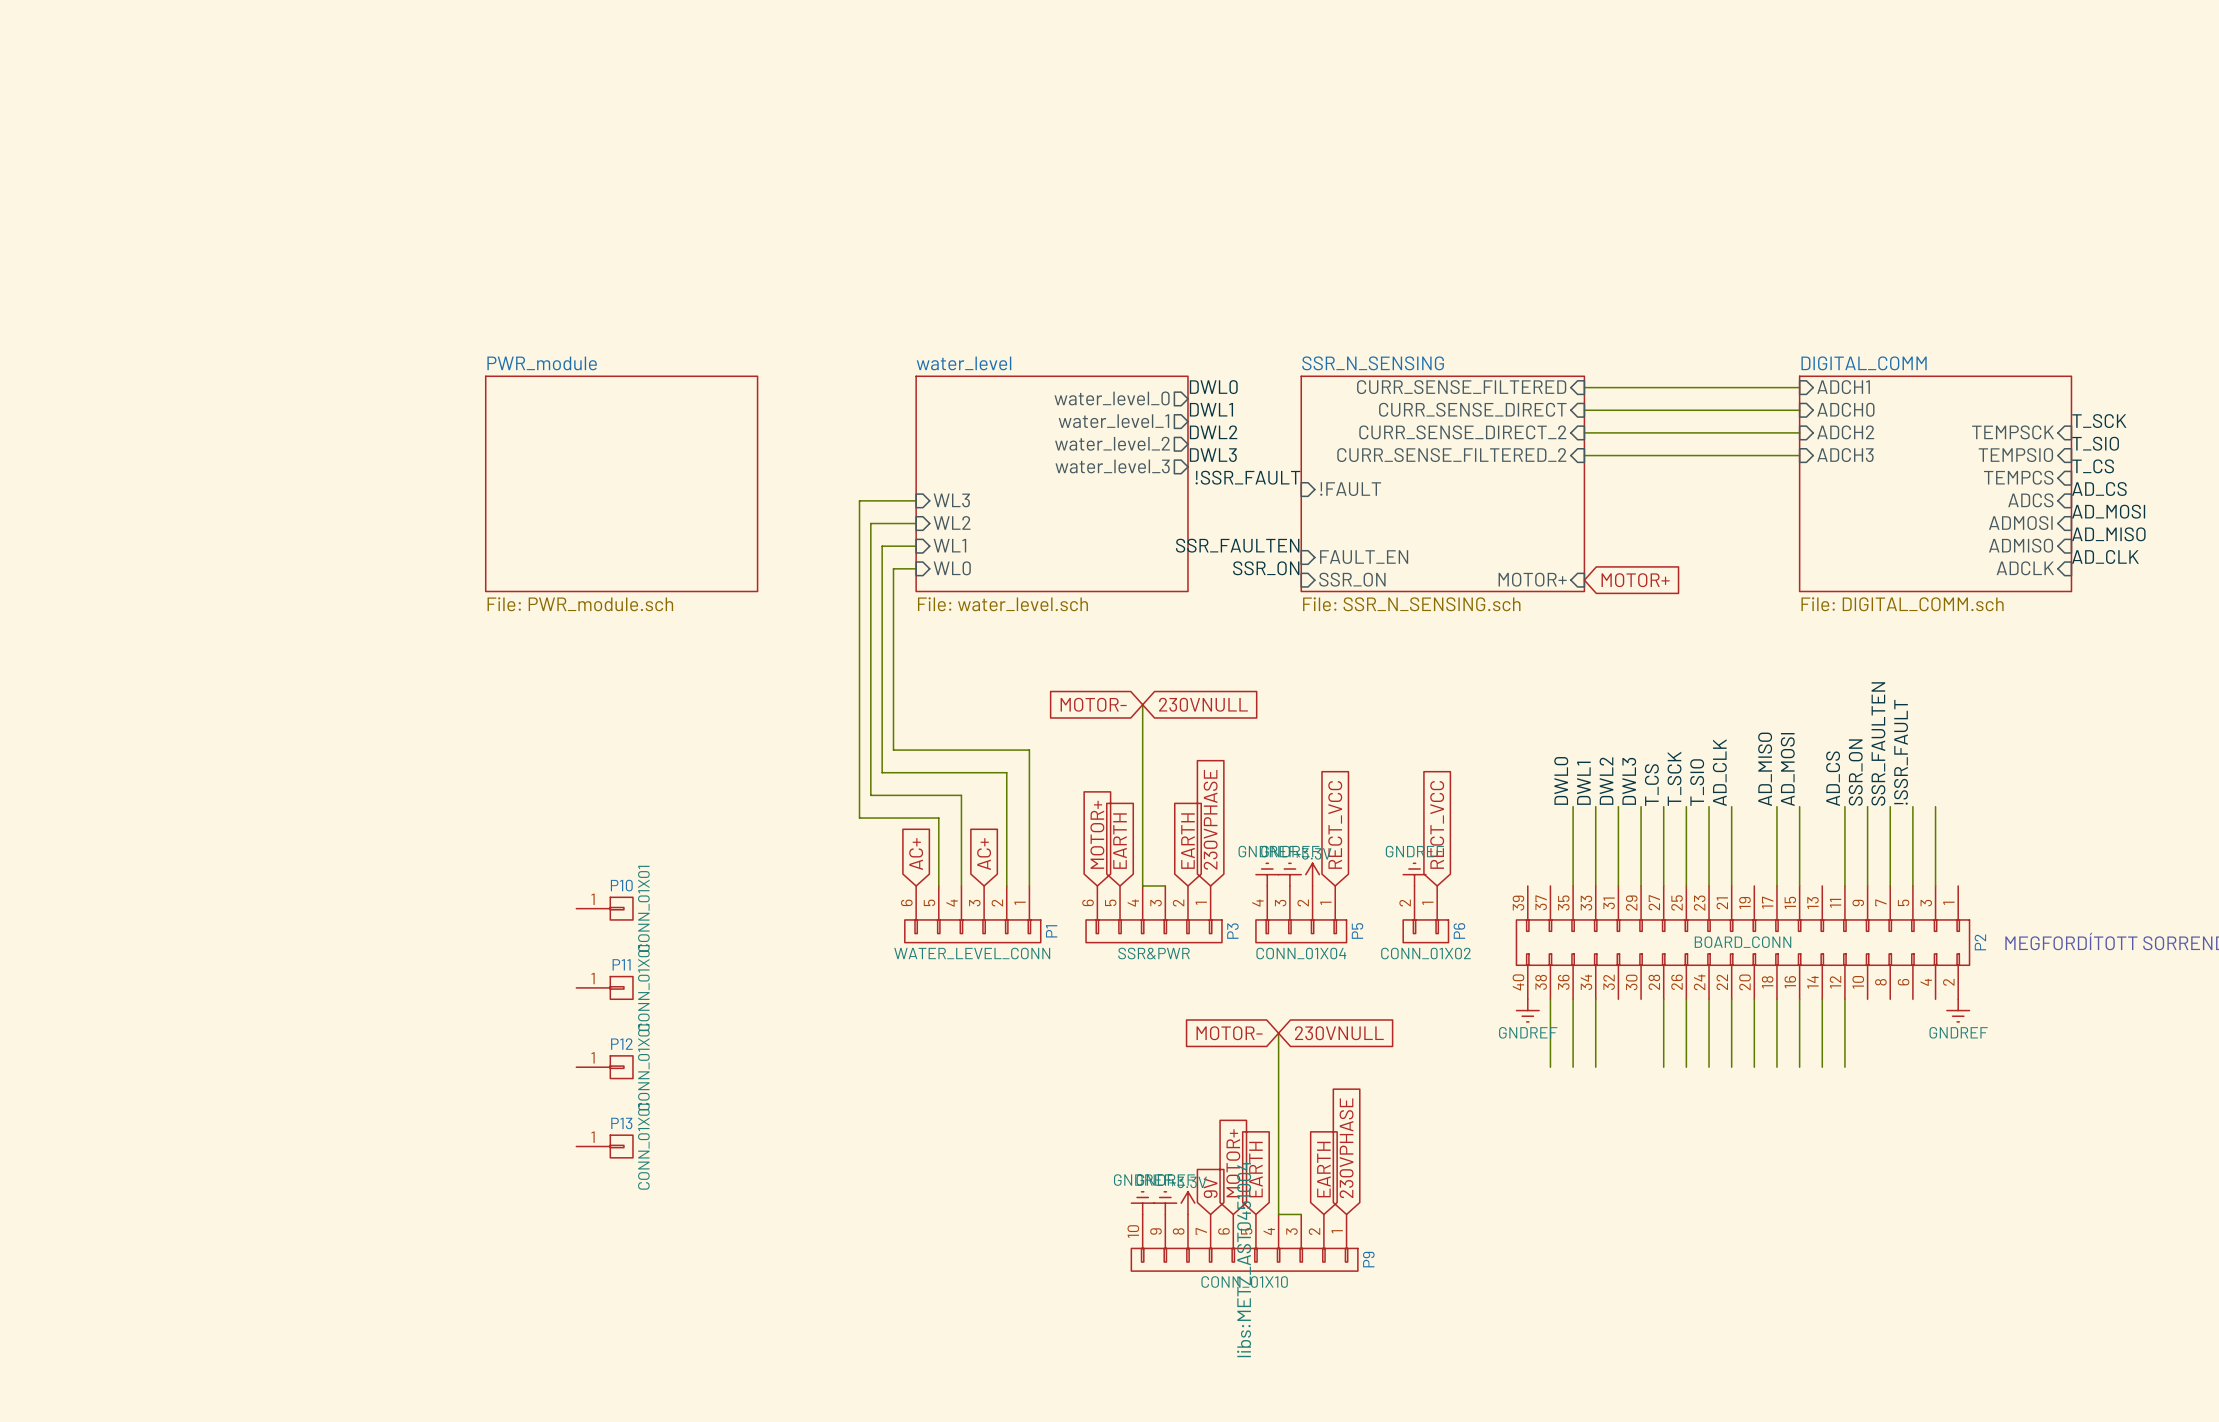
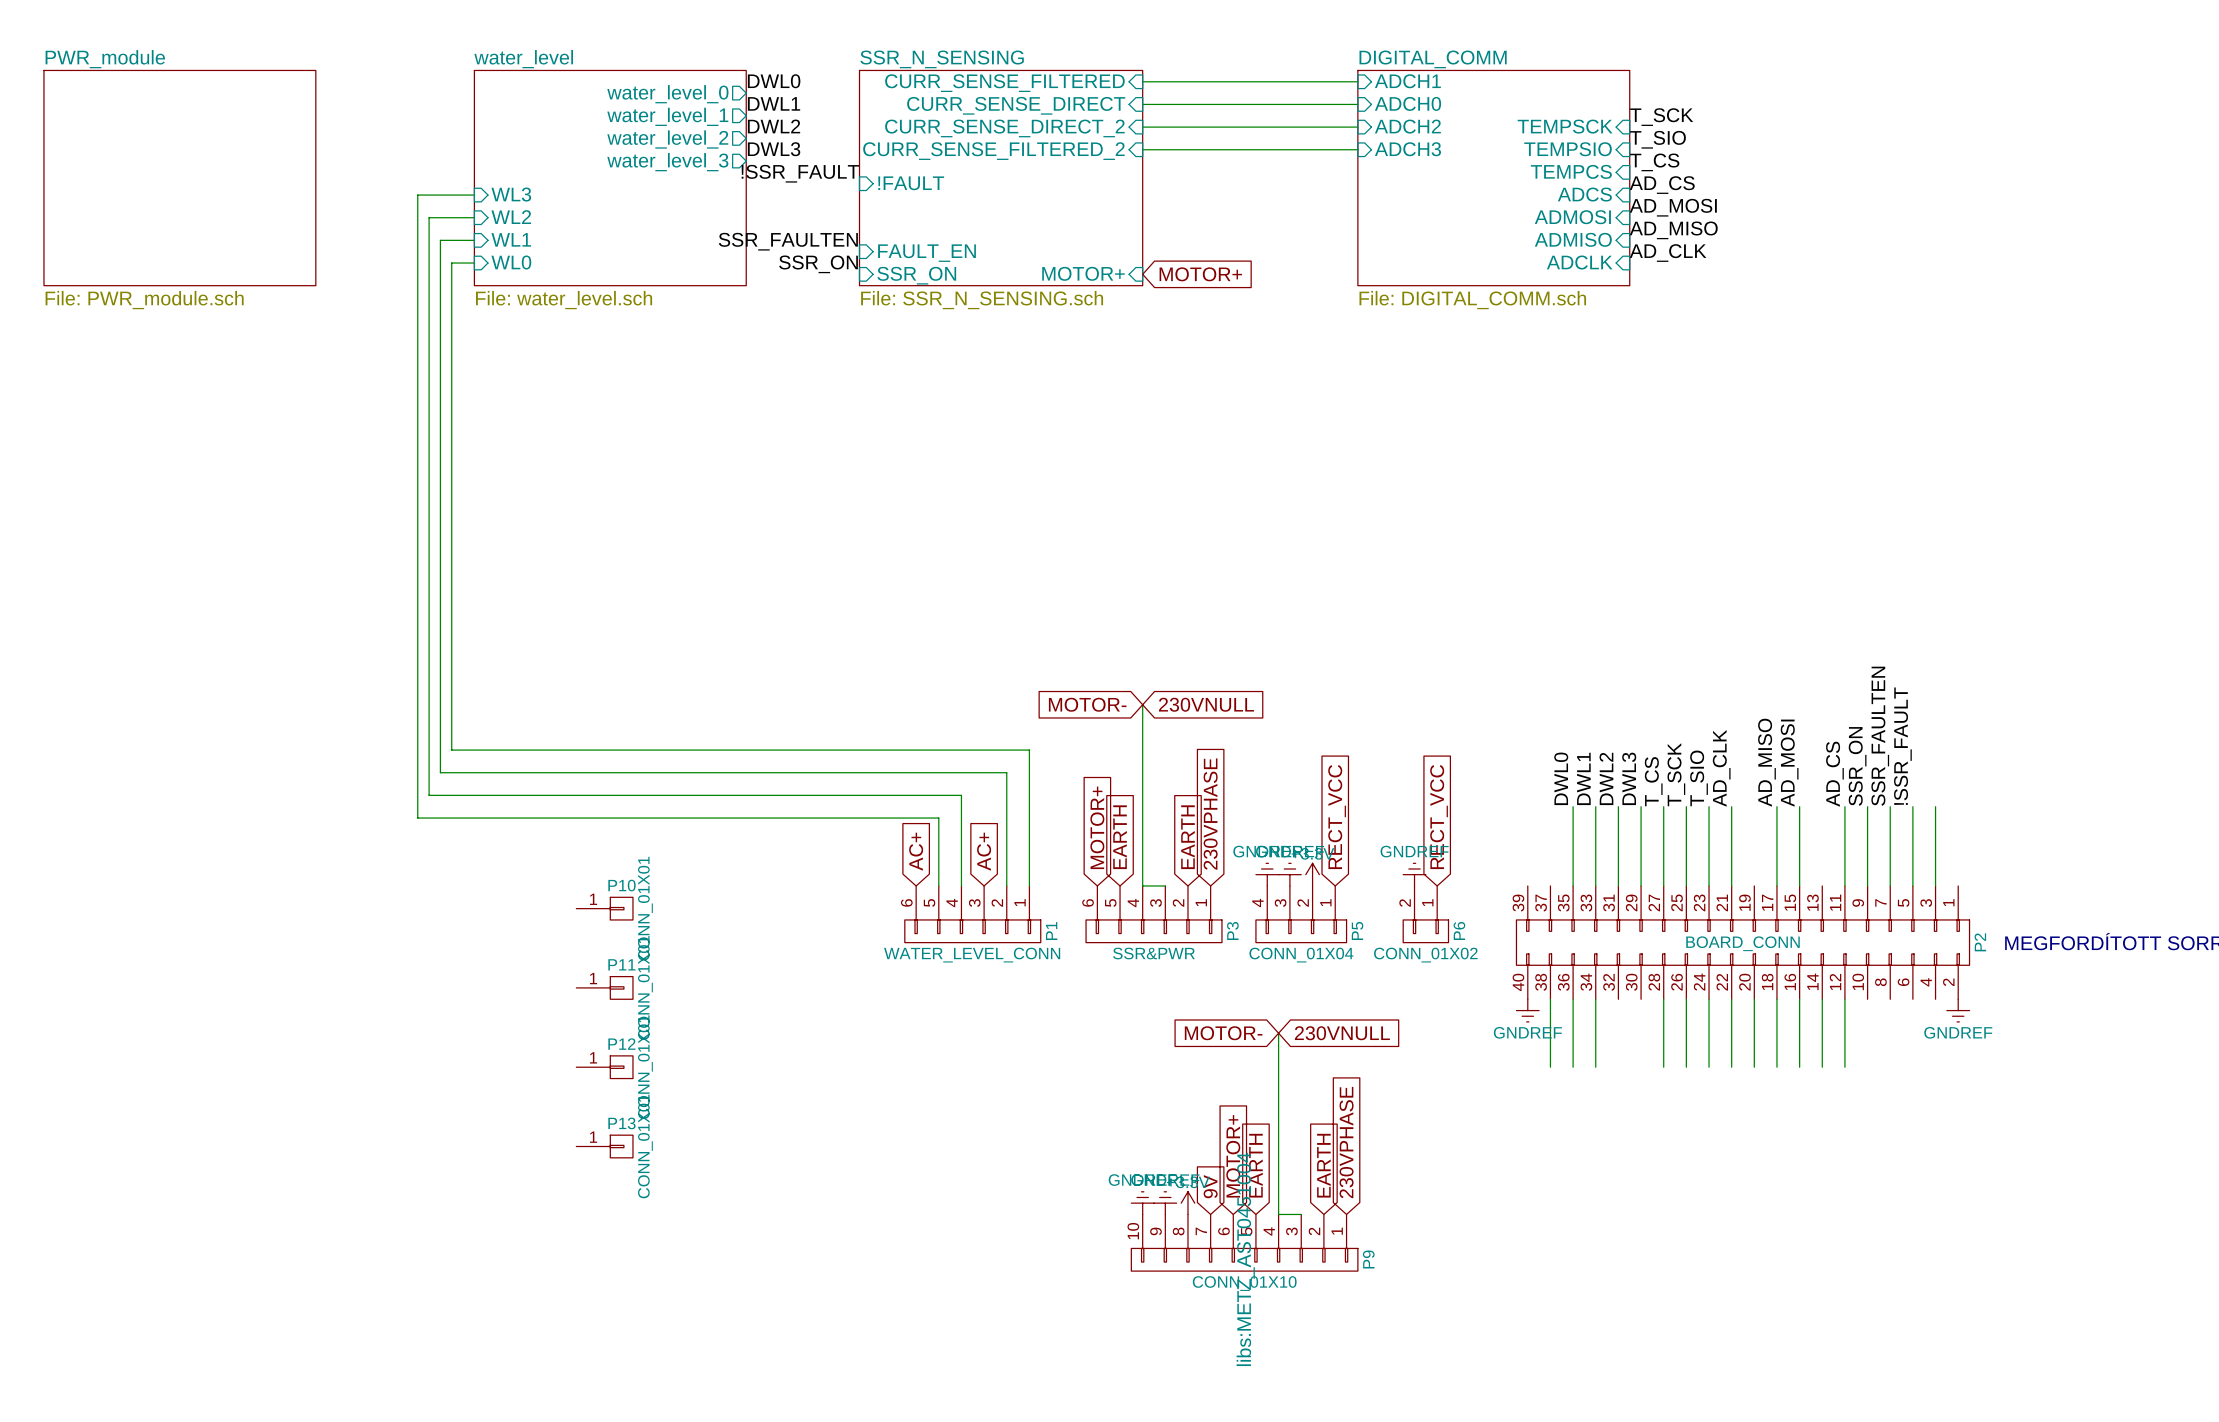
label: none -> DWL0 (774, 81)
sheet pin: none -> CURR_SENSE_FILTERED (1004, 83)
wire: none -> (1142, 81) (1357, 81)
sheet pin: none -> ADCH1 (1407, 81)
sheet pin: none -> water_level_0 (667, 94)
label: none -> DWL1 (774, 103)
sheet pin: none -> CURR_SENSE_DIRECT (1016, 105)
sheet pin: none -> ADCH0 (1407, 103)
wire: none -> (1142, 104) (1357, 104)
sheet pin: none -> water_level_1 (667, 116)
label: none -> T_SCK (1661, 117)
label: none -> DWL2 (774, 126)
sheet pin: none -> CURR_SENSE_DIRECT_2 (1004, 128)
sheet pin: none -> ADCH2 (1407, 126)
sheet pin: none -> TEMPSCK (1565, 126)
wire: none -> (1142, 127) (1357, 127)
sheet pin: none -> water_level_2 (667, 139)
label: none -> T_SIO (1658, 139)
label: none -> DWL3 (774, 149)
sheet pin: none -> CURR_SENSE_FILTERED_2 (993, 151)
wire: none -> (1142, 149) (1357, 149)
sheet pin: none -> ADCH3 (1407, 149)
sheet pin: none -> TEMPSIO (1568, 149)
sheet pin: none -> water_level_3 (667, 162)
label: none -> T_CS (1654, 162)
label: none -> !SSR_FAULT (800, 173)
sheet pin: none -> TEMPCS (1571, 171)
sheet PWR_module: none -> File: PWR_module.sch (179, 178)
sheet water_level: none -> File: water_level.sch (610, 178)
sheet SSR_N_SENSING: none -> File: SSR_N_SENSING.sch (1001, 178)
sheet DIGITAL_COMM: none -> File: DIGITAL_COMM.sch (1493, 178)
sheet pin: none -> !FAULT (911, 183)
label: none -> AD_CS (1662, 185)
sheet pin: none -> WL3 (511, 194)
sheet pin: none -> ADCS (1584, 194)
label: none -> AD_MOSI (1673, 207)
sheet pin: none -> WL2 (511, 217)
sheet pin: none -> ADMOSI (1572, 217)
label: none -> AD_MISO (1673, 230)
sheet pin: none -> WL1 (511, 239)
label: none -> SSR_FAULTEN (788, 241)
sheet pin: none -> ADMISO (1573, 239)
sheet pin: none -> FAULT_EN (927, 253)
label: none -> AD_CLK (1668, 253)
sheet pin: none -> WL0 (511, 262)
label: none -> SSR_ON (818, 264)
sheet pin: none -> ADCLK (1579, 262)
sheet pin: none -> SSR_ON (916, 275)
sheet pin: none -> MOTOR+ (1083, 273)
global label: none -> MOTOR+ (1200, 274)
label: DWL0 (1213, 387) -> none
sheet pin: CURR_SENSE_FILTERED (1461, 387) -> none
wire: (1584, 387) (1799, 387) -> none
sheet pin: ADCH1 (1843, 387) -> none
sheet pin: water_level_0 (1112, 398) -> none
label: DWL1 (1211, 409) -> none
sheet pin: CURR_SENSE_DIRECT (1472, 409) -> none
sheet pin: ADCH0 (1845, 409) -> none
wire: (1584, 410) (1799, 410) -> none
sheet pin: water_level_1 (1113, 421) -> none
label: T_SCK (2099, 421) -> none
label: DWL2 (1213, 432) -> none
sheet pin: CURR_SENSE_DIRECT_2 (1462, 432) -> none
wire: (1584, 432) (1799, 432) -> none
sheet pin: ADCH2 (1845, 432) -> none
sheet pin: TEMPSCK (2013, 432) -> none
sheet pin: water_level_2 (1112, 443) -> none
label: T_SIO (2095, 443) -> none
label: DWL3 (1213, 455) -> none
sheet pin: CURR_SENSE_FILTERED_2 (1451, 455) -> none
wire: (1584, 455) (1799, 455) -> none
sheet pin: ADCH3 (1845, 455) -> none
sheet pin: TEMPSIO (2015, 455) -> none
sheet pin: water_level_3 (1112, 466) -> none
label: T_CS (2093, 466) -> none
label: !SSR_FAULT (1248, 477) -> none
sheet pin: TEMPCS (2018, 477) -> none
sheet PWR_module: File: PWR_module.sch (621, 483) -> none
sheet water_level: File: water_level.sch (1052, 483) -> none
sheet SSR_N_SENSING: File: SSR_N_SENSING.sch (1442, 483) -> none
sheet DIGITAL_COMM: File: DIGITAL_COMM.sch (1935, 483) -> none
sheet pin: !FAULT (1350, 489) -> none
label: AD_CS (2099, 489) -> none
wire: (916, 500) (859, 500) (859, 818) -> (474, 195) (417, 195) (417, 818) (859, 818)
sheet pin: WL3 (951, 500) -> none
sheet pin: ADCS (2030, 500) -> none
label: AD_MOSI (2108, 511) -> none
sheet pin: WL2 (952, 522) -> none
wire: (916, 523) (870, 523) (870, 795) -> (474, 217) (429, 217) (429, 795) (870, 795)
sheet pin: ADMOSI (2020, 523) -> none
label: AD_MISO (2108, 534) -> none
sheet pin: WL1 (949, 545) -> none
label: SSR_FAULTEN (1237, 545) -> none
sheet pin: ADMISO (2021, 545) -> none
wire: (916, 546) (882, 546) (882, 772) -> (474, 240) (440, 240) (440, 772) (882, 772)
label: AD_CLK (2105, 556) -> none
sheet pin: FAULT_EN (1364, 557) -> none
wire: (916, 568) (893, 568) (893, 750) -> (474, 263) (451, 263) (451, 750) (893, 750)
sheet pin: WL0 (952, 568) -> none
label: SSR_ON (1266, 568) -> none
sheet pin: ADCLK (2025, 568) -> none
sheet pin: SSR_ON (1352, 579) -> none
sheet pin: MOTOR+ (1532, 579) -> none
global label: MOTOR+ (1635, 580) -> none

